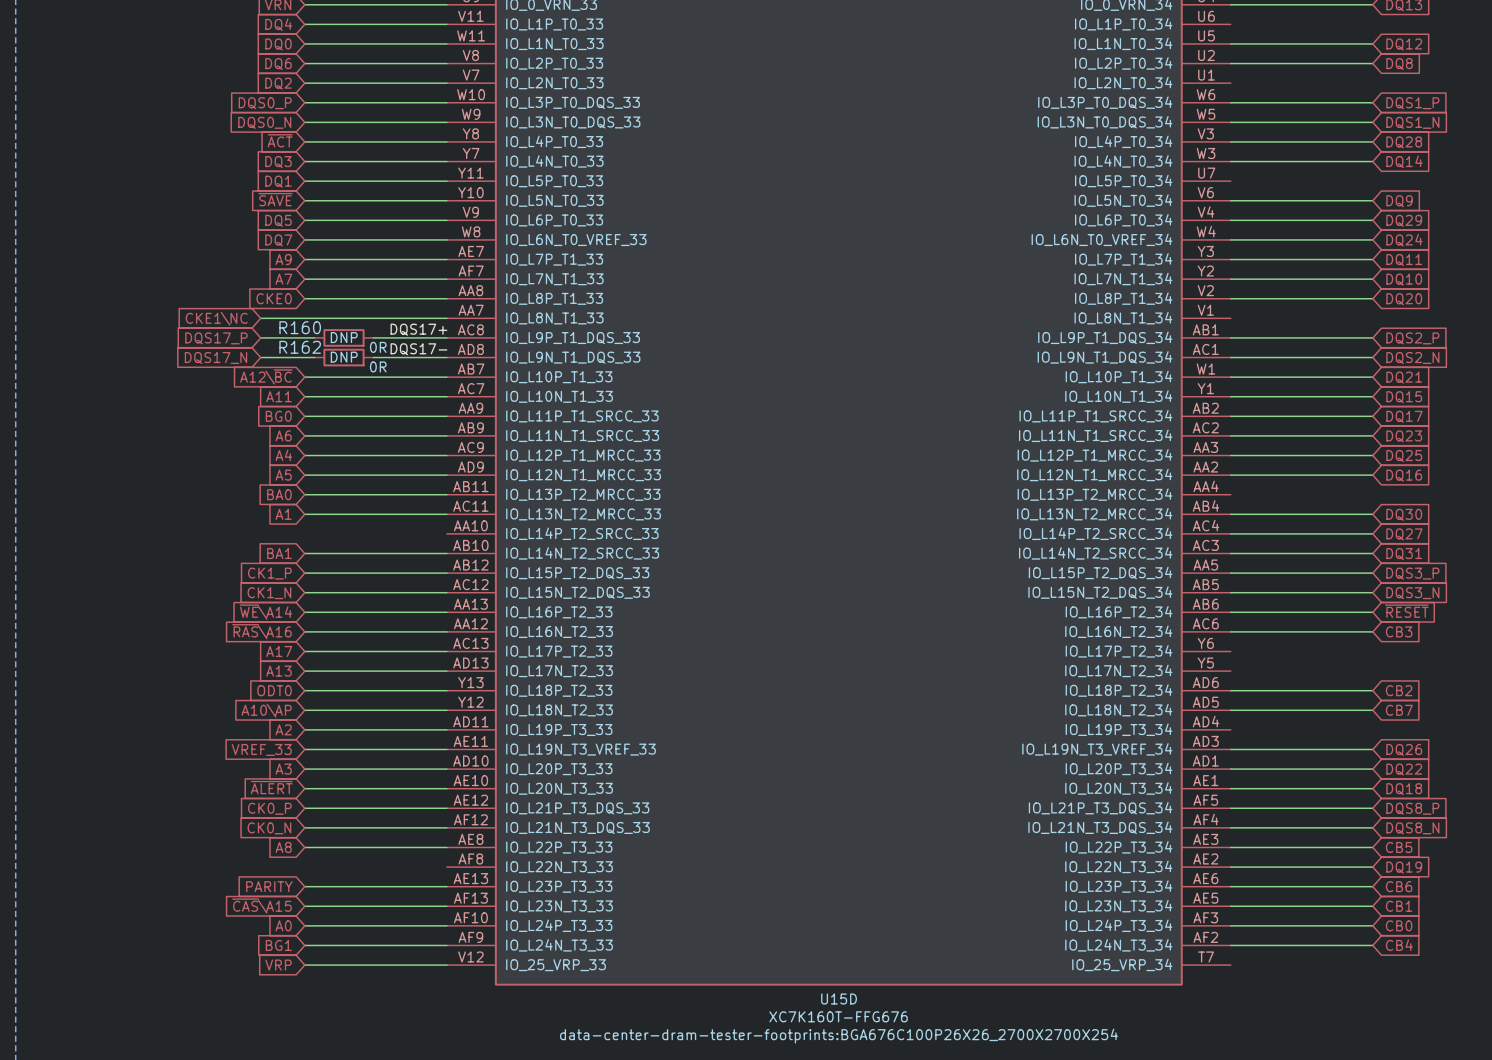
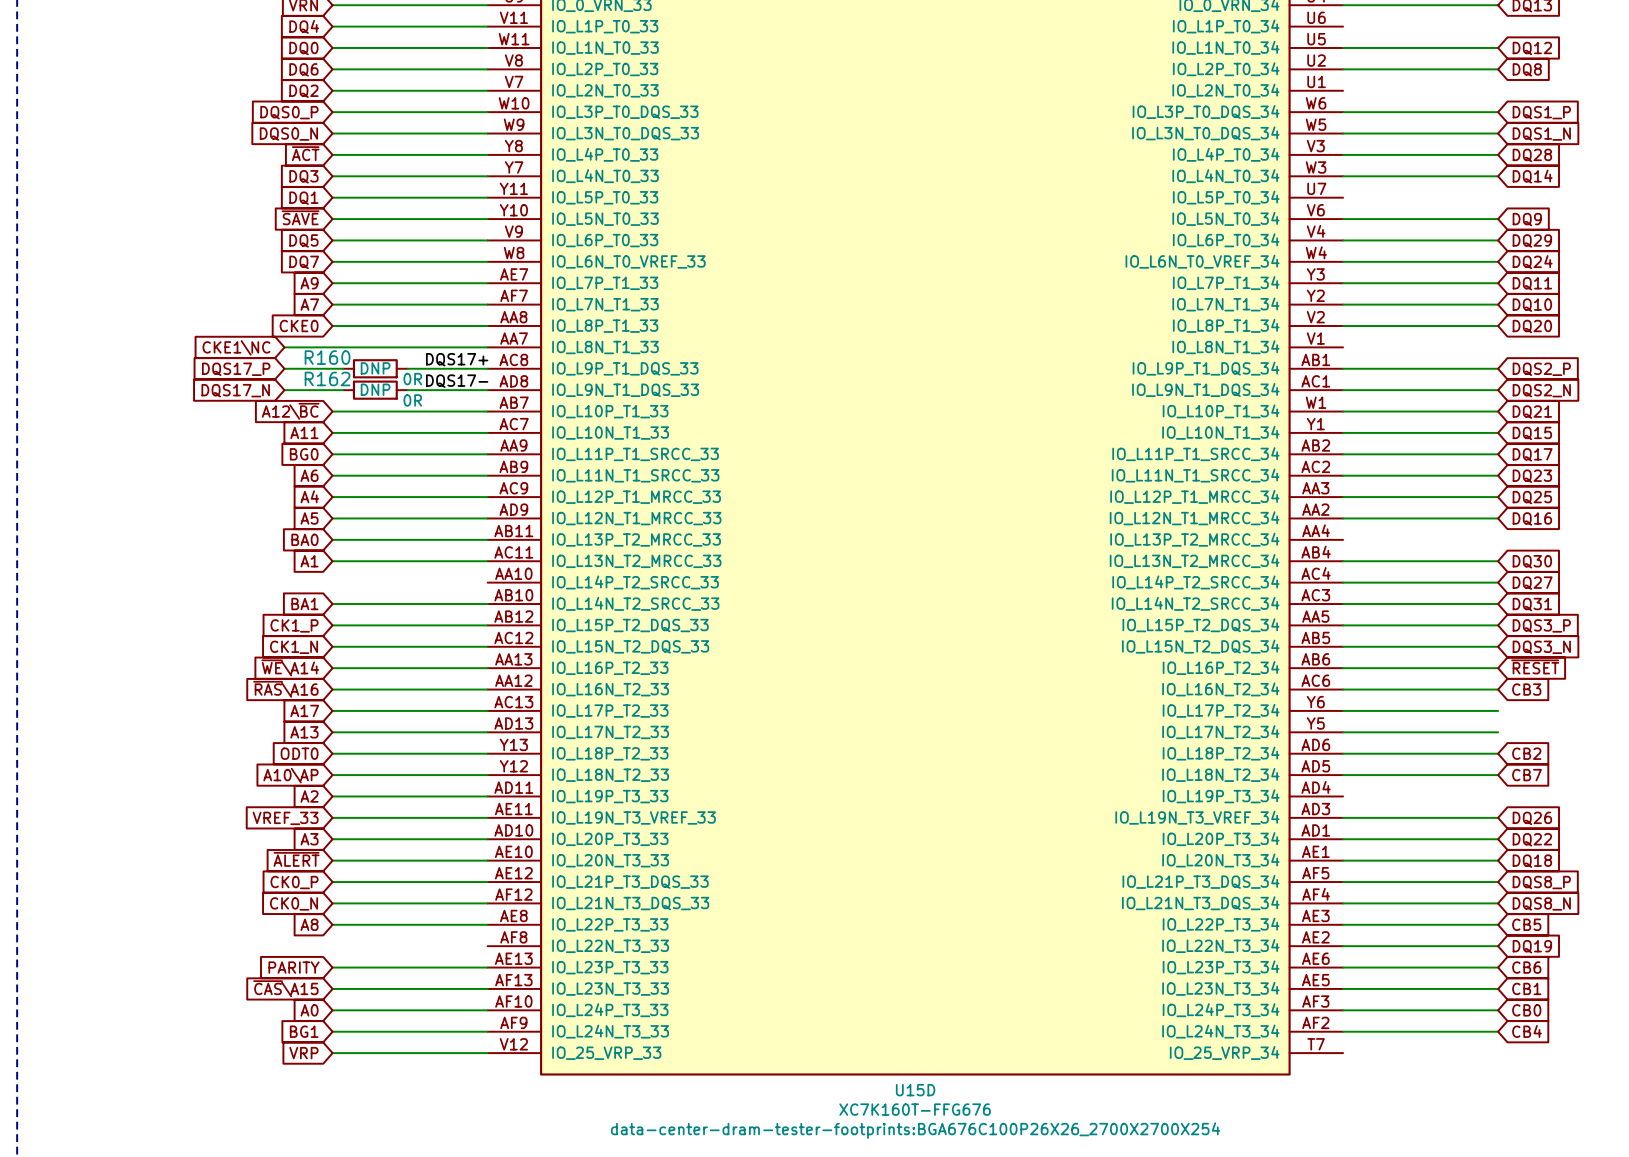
wire: none -> (1343, 710) (1498, 710)
wire: none -> (1343, 732) (1498, 732)

